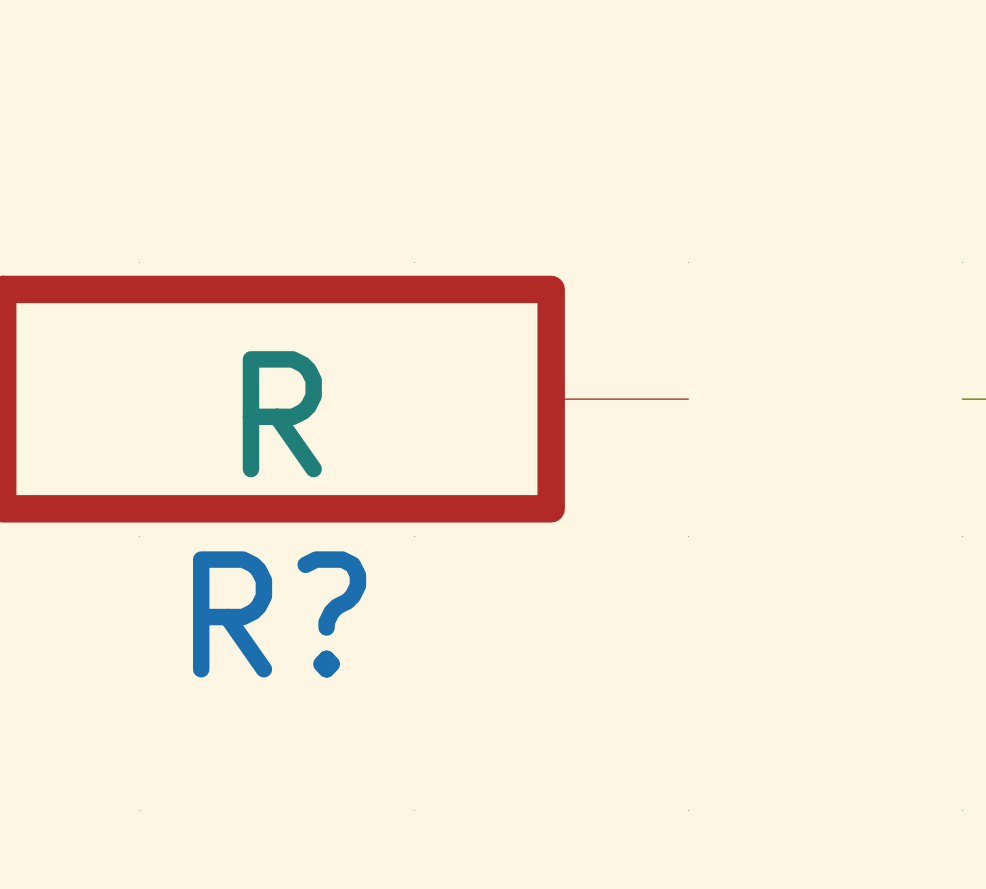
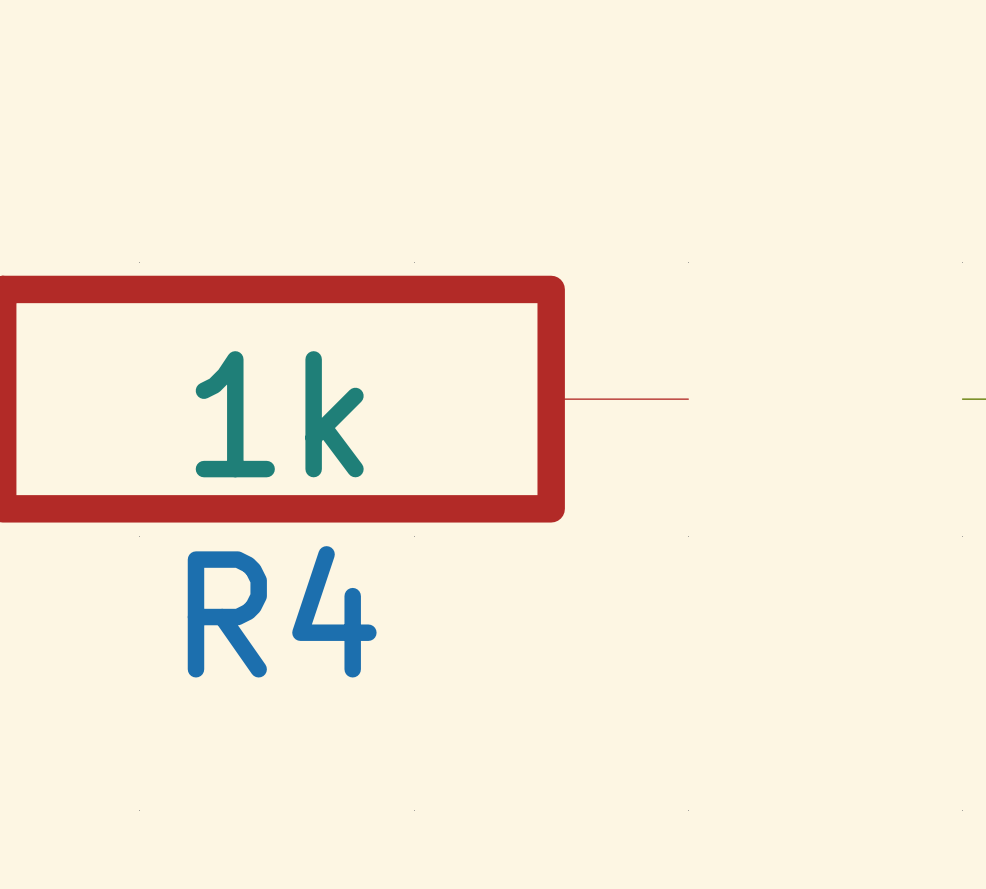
R? value: R (282, 414) -> 1k (279, 414)
R? name: R? (279, 614) -> R4 (282, 611)

